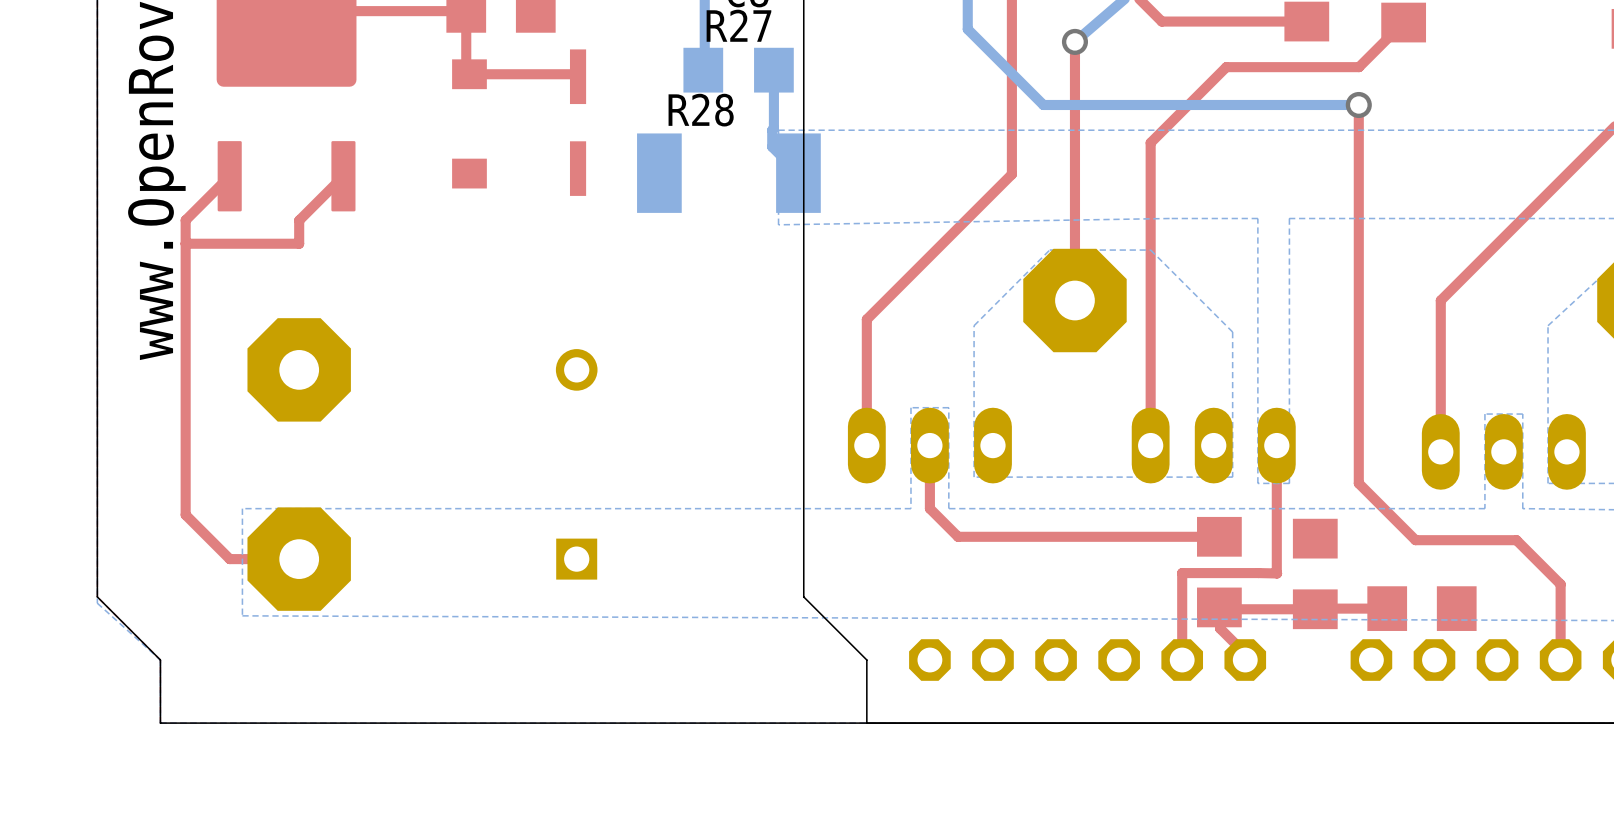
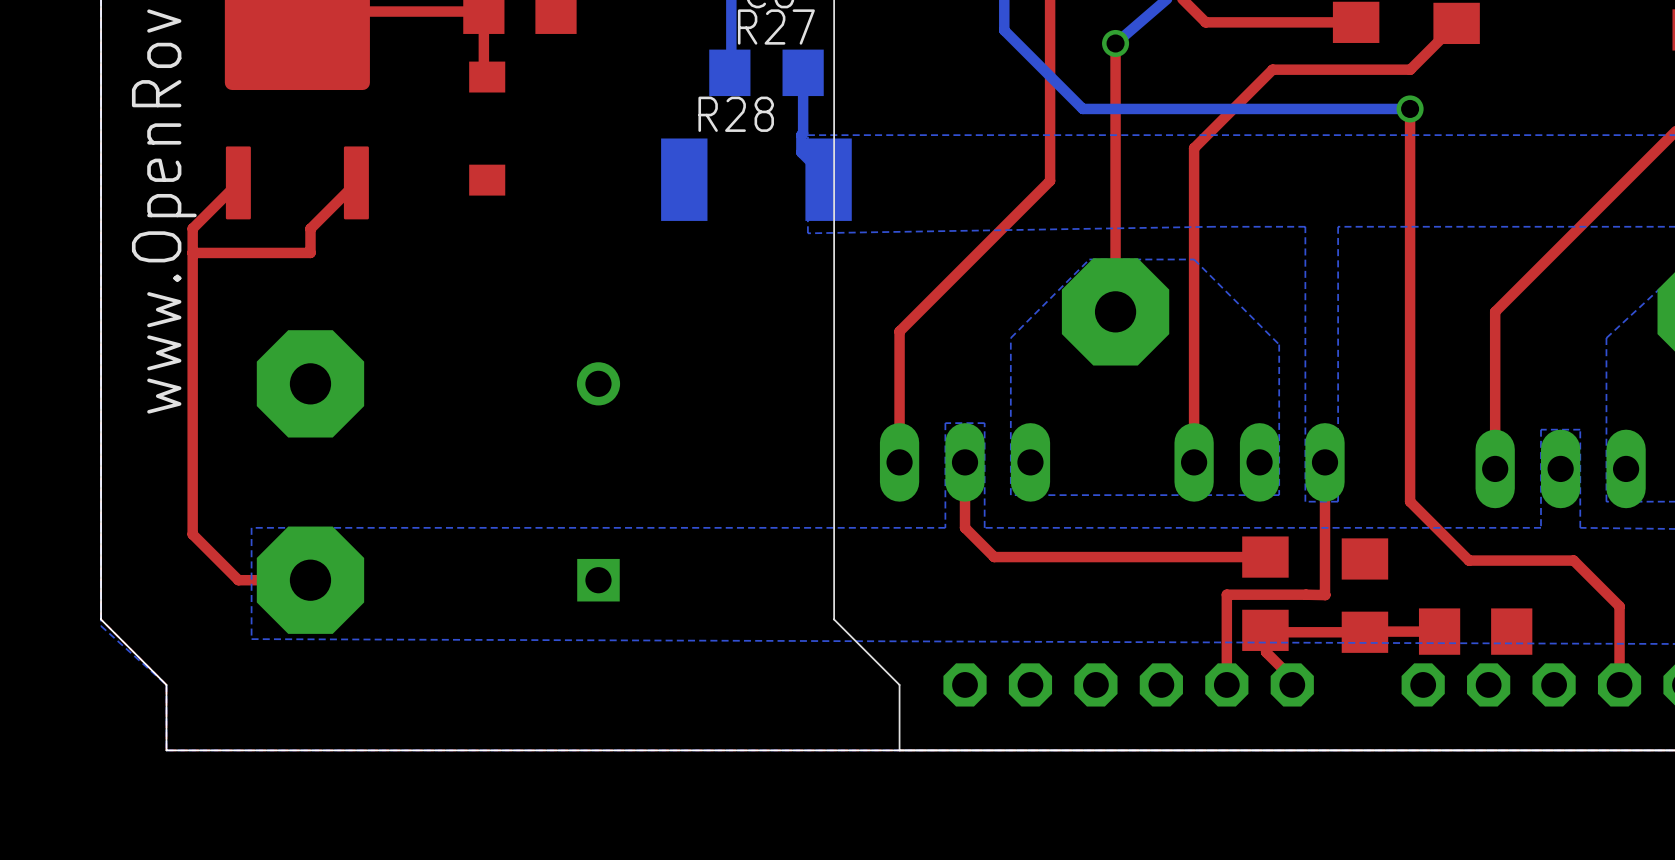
top track: (469, 74) (575, 74) (578, 76) -> none
part: (578, 122) -> none

